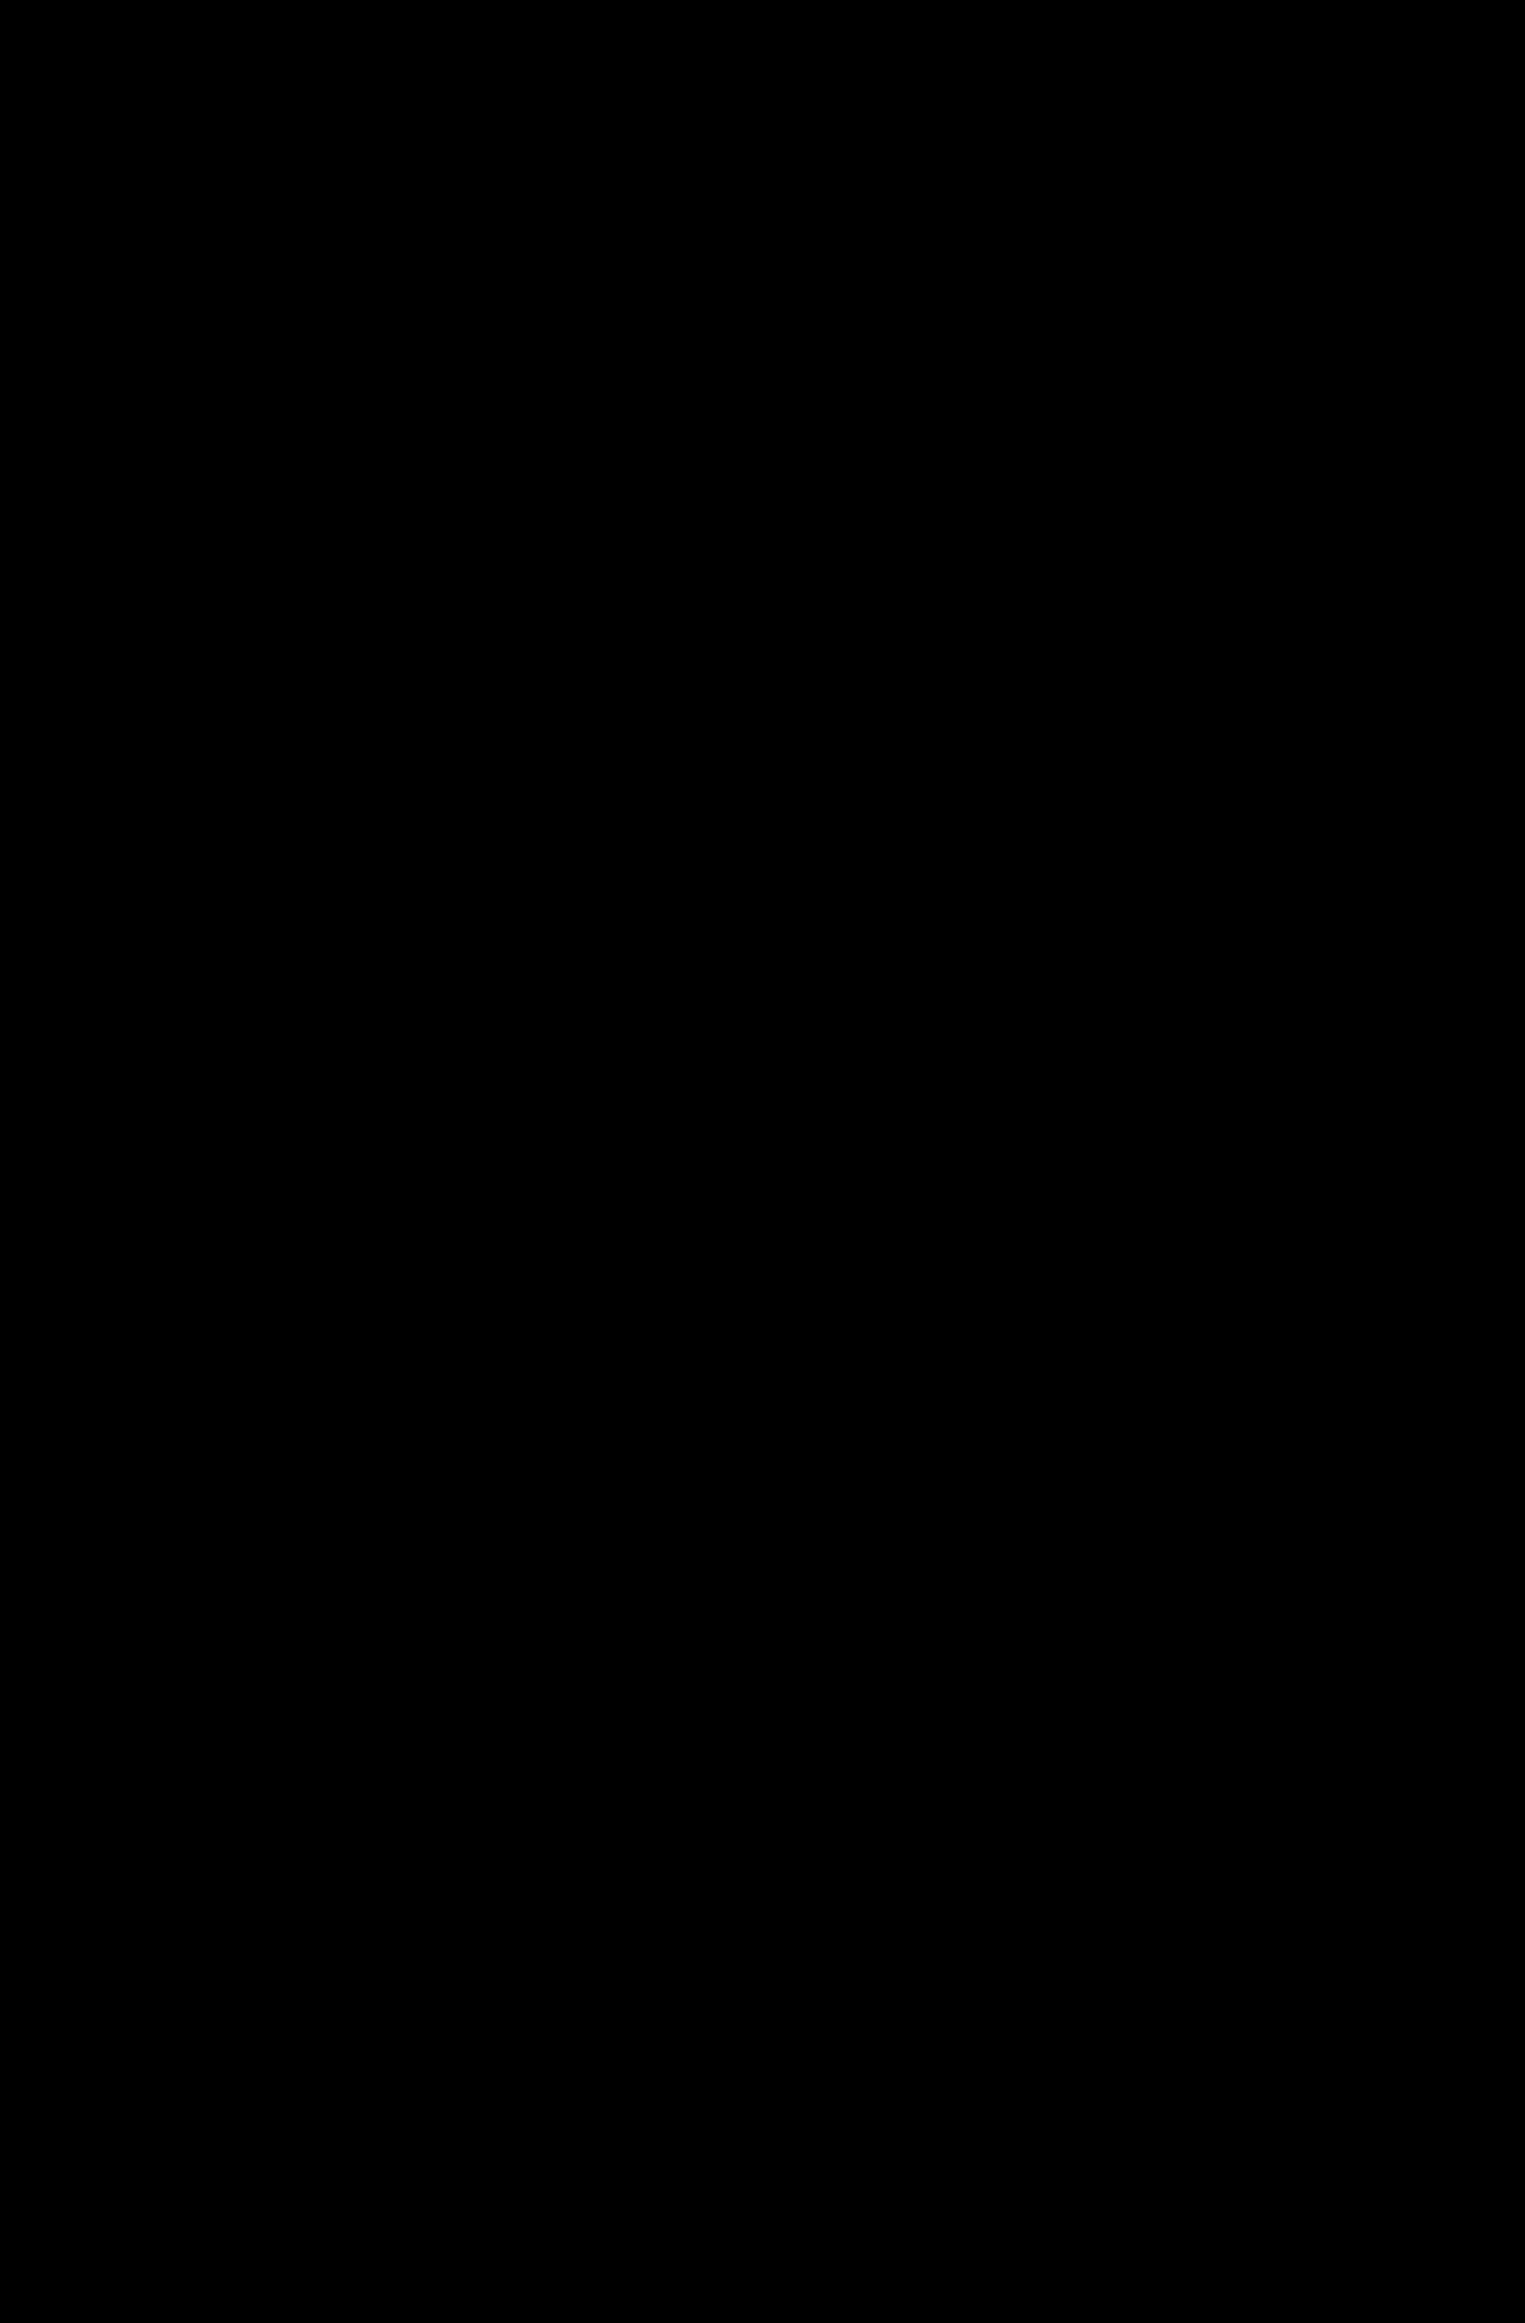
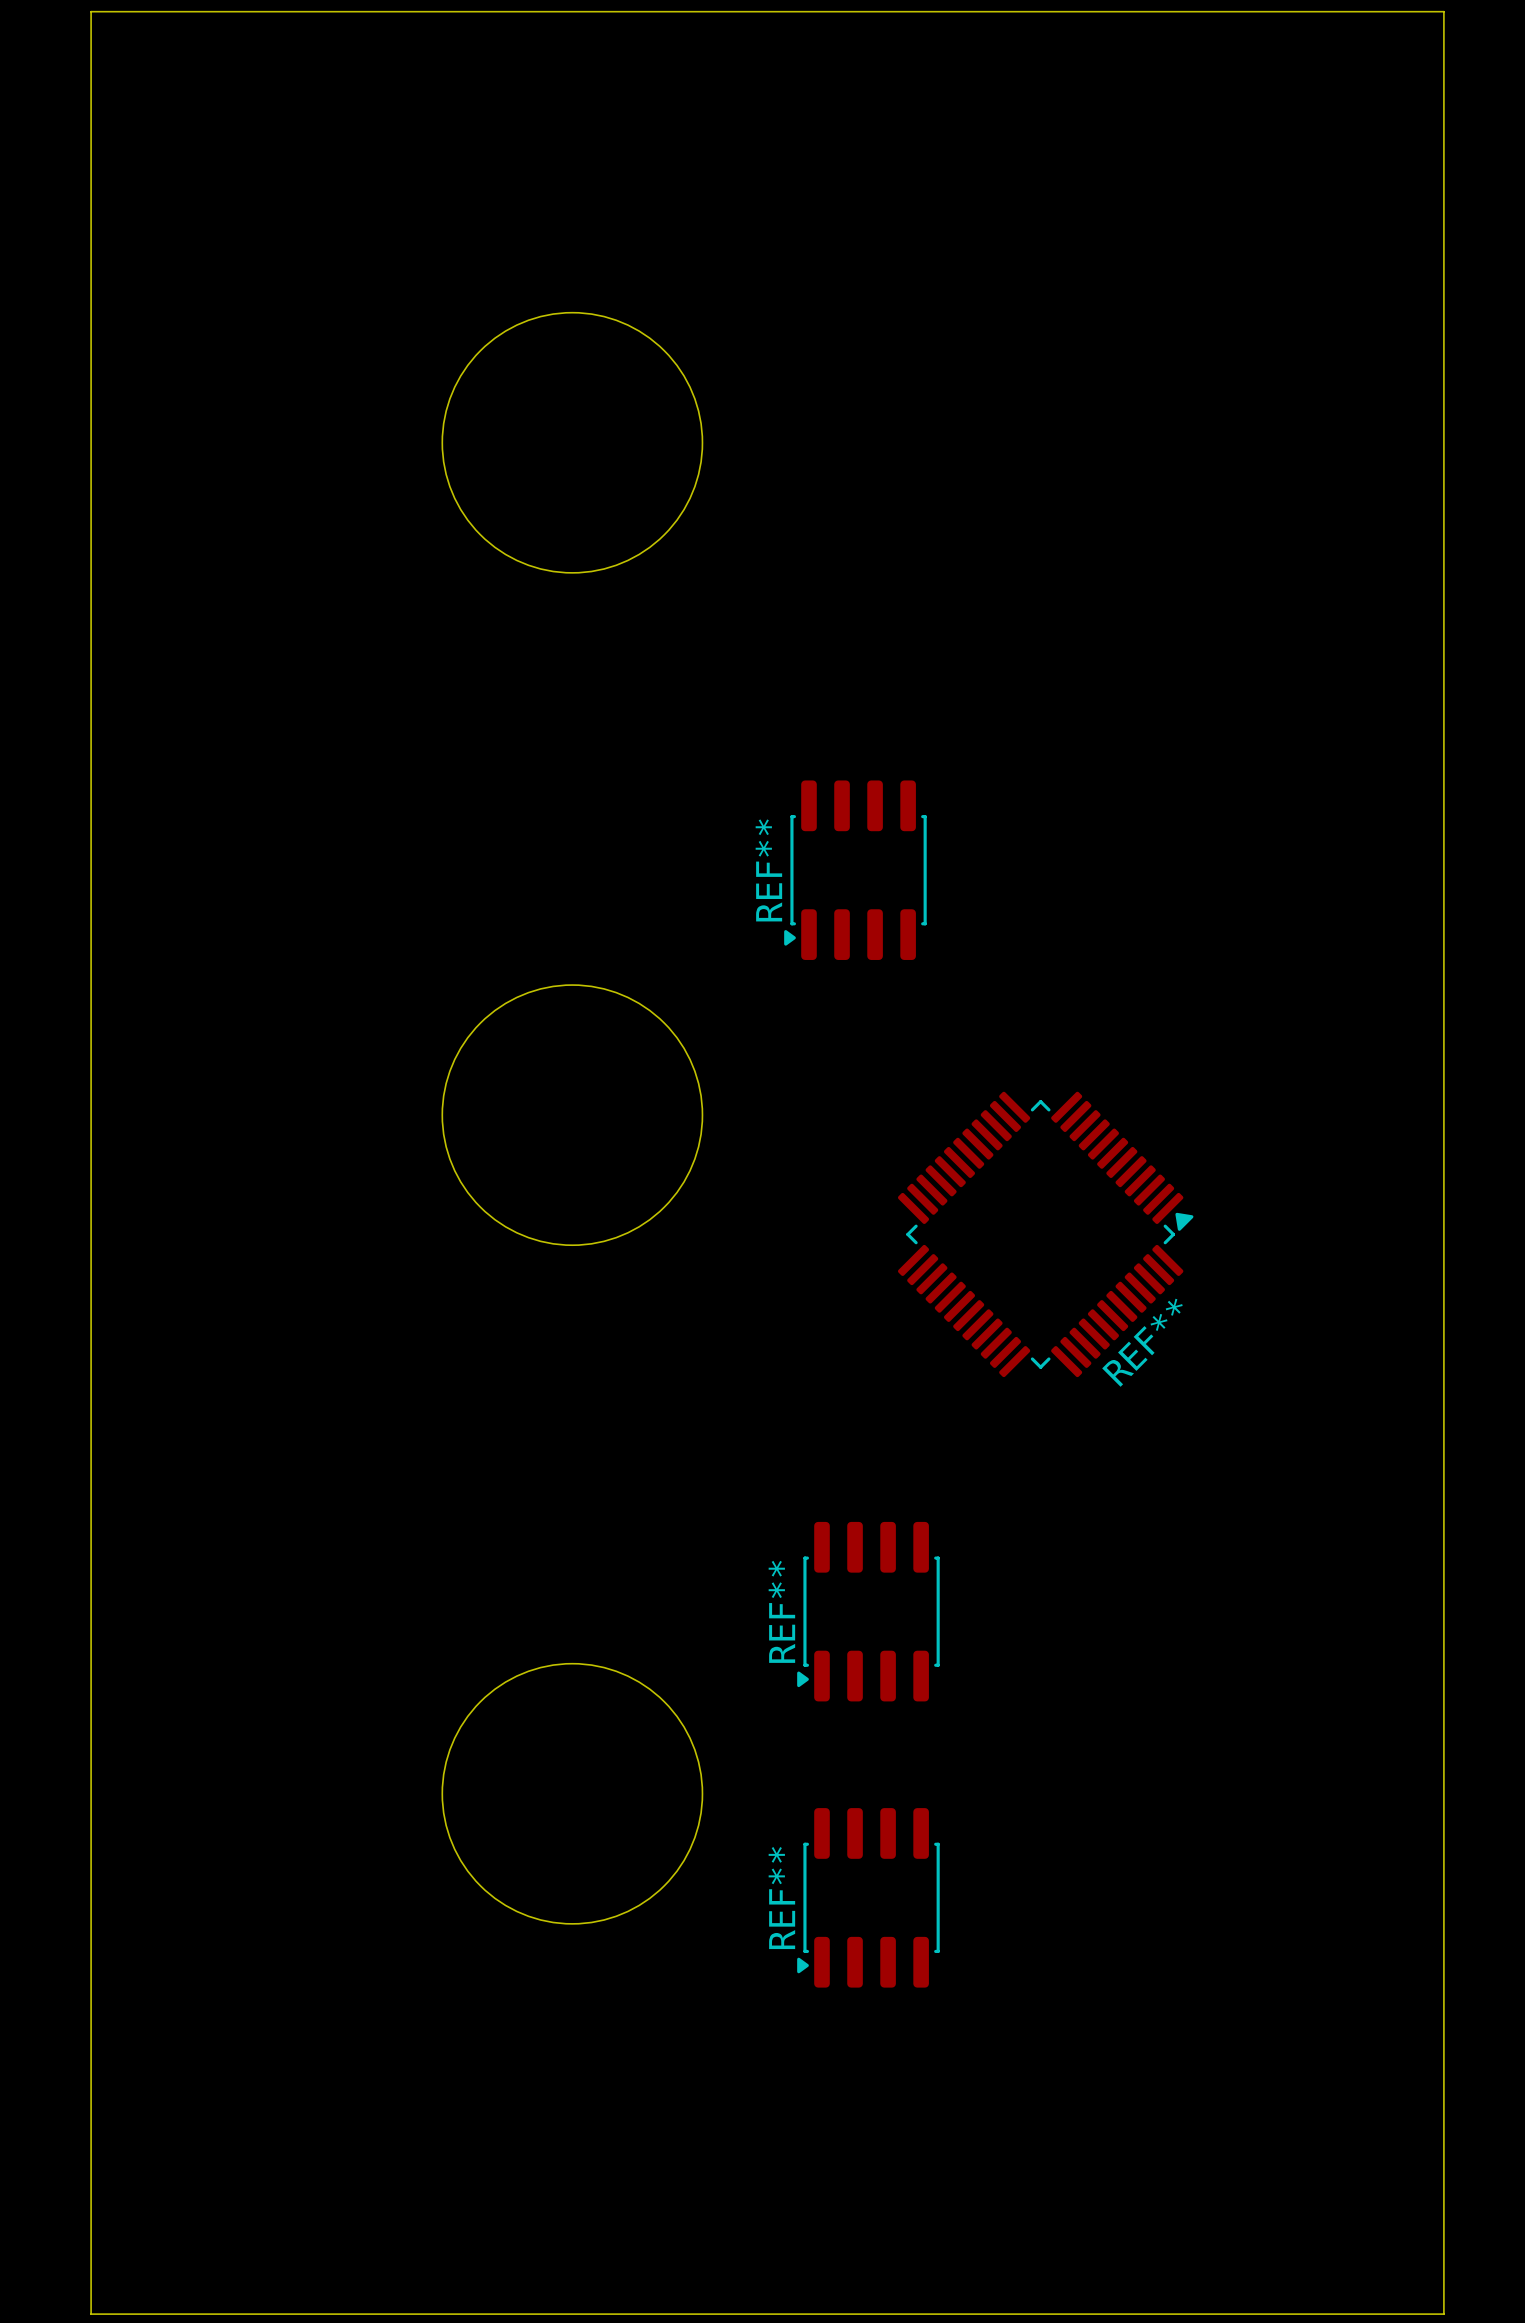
board edge: none -> (91, 11) (1443, 11) (1443, 2314) (91, 2314) (91, 11)
round board edge: none -> [441, 312, 704, 574]
REF**: none -> (855, 870)
round board edge: none -> [441, 984, 704, 1246]
REF**: none -> (1045, 1234)
REF**: none -> (868, 1611)
round board edge: none -> [441, 1663, 704, 1925]
REF**: none -> (868, 1897)

